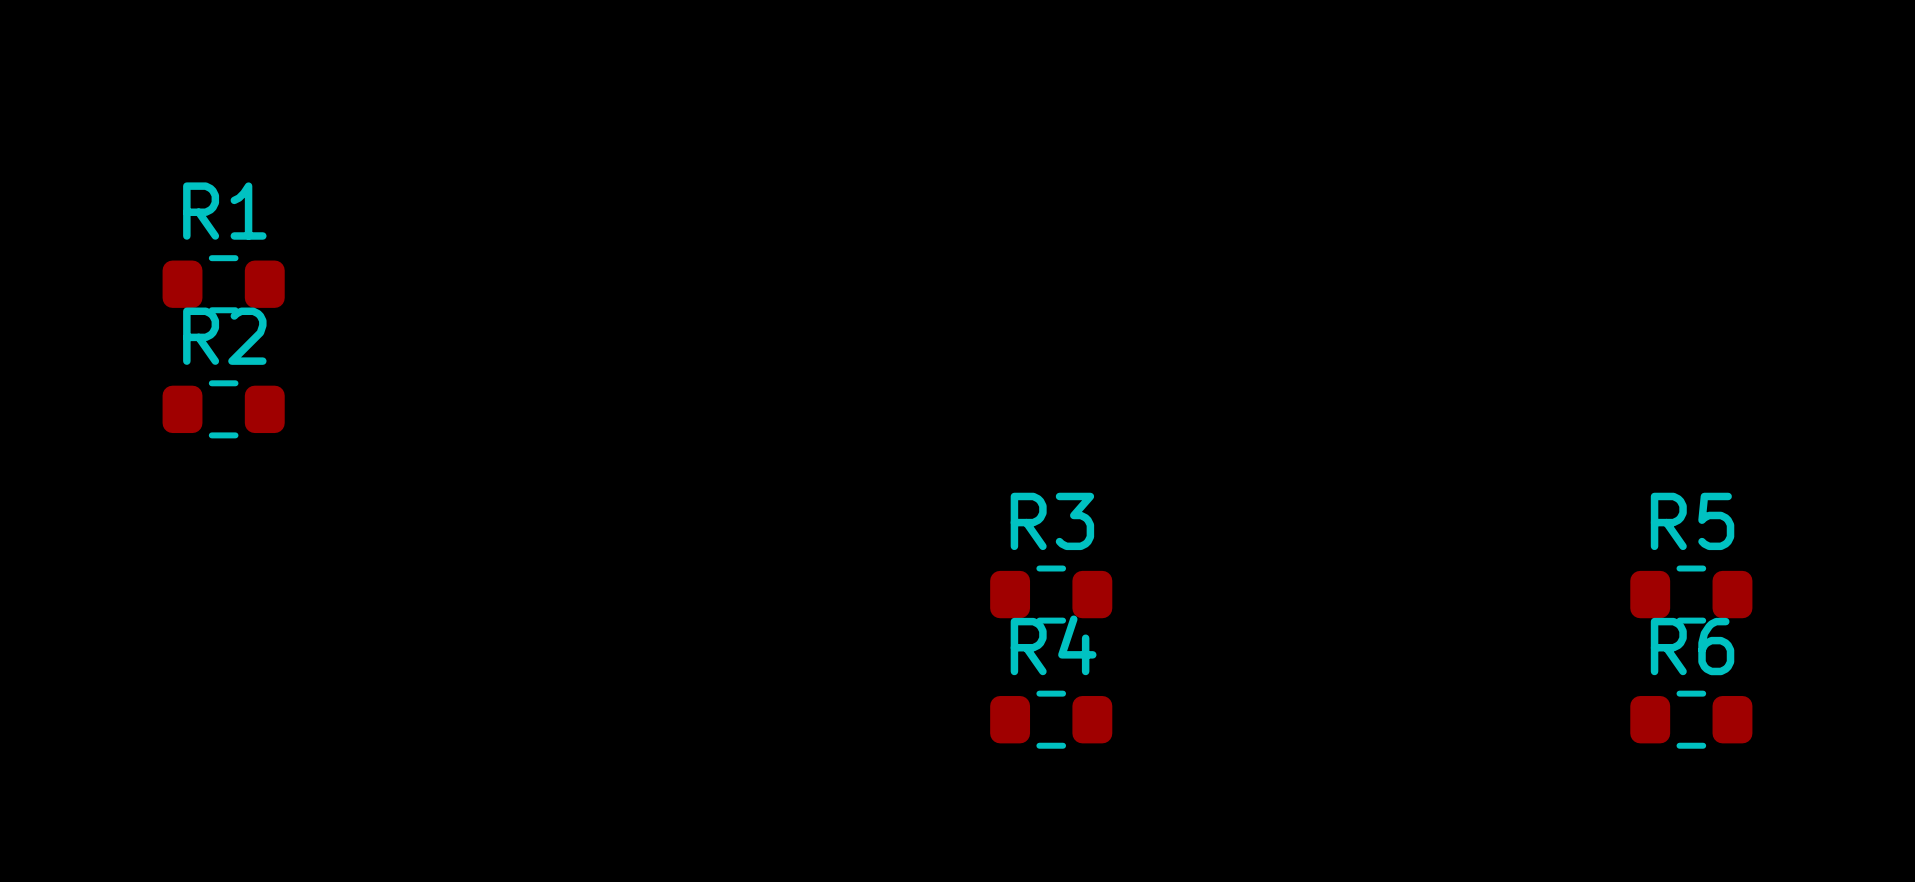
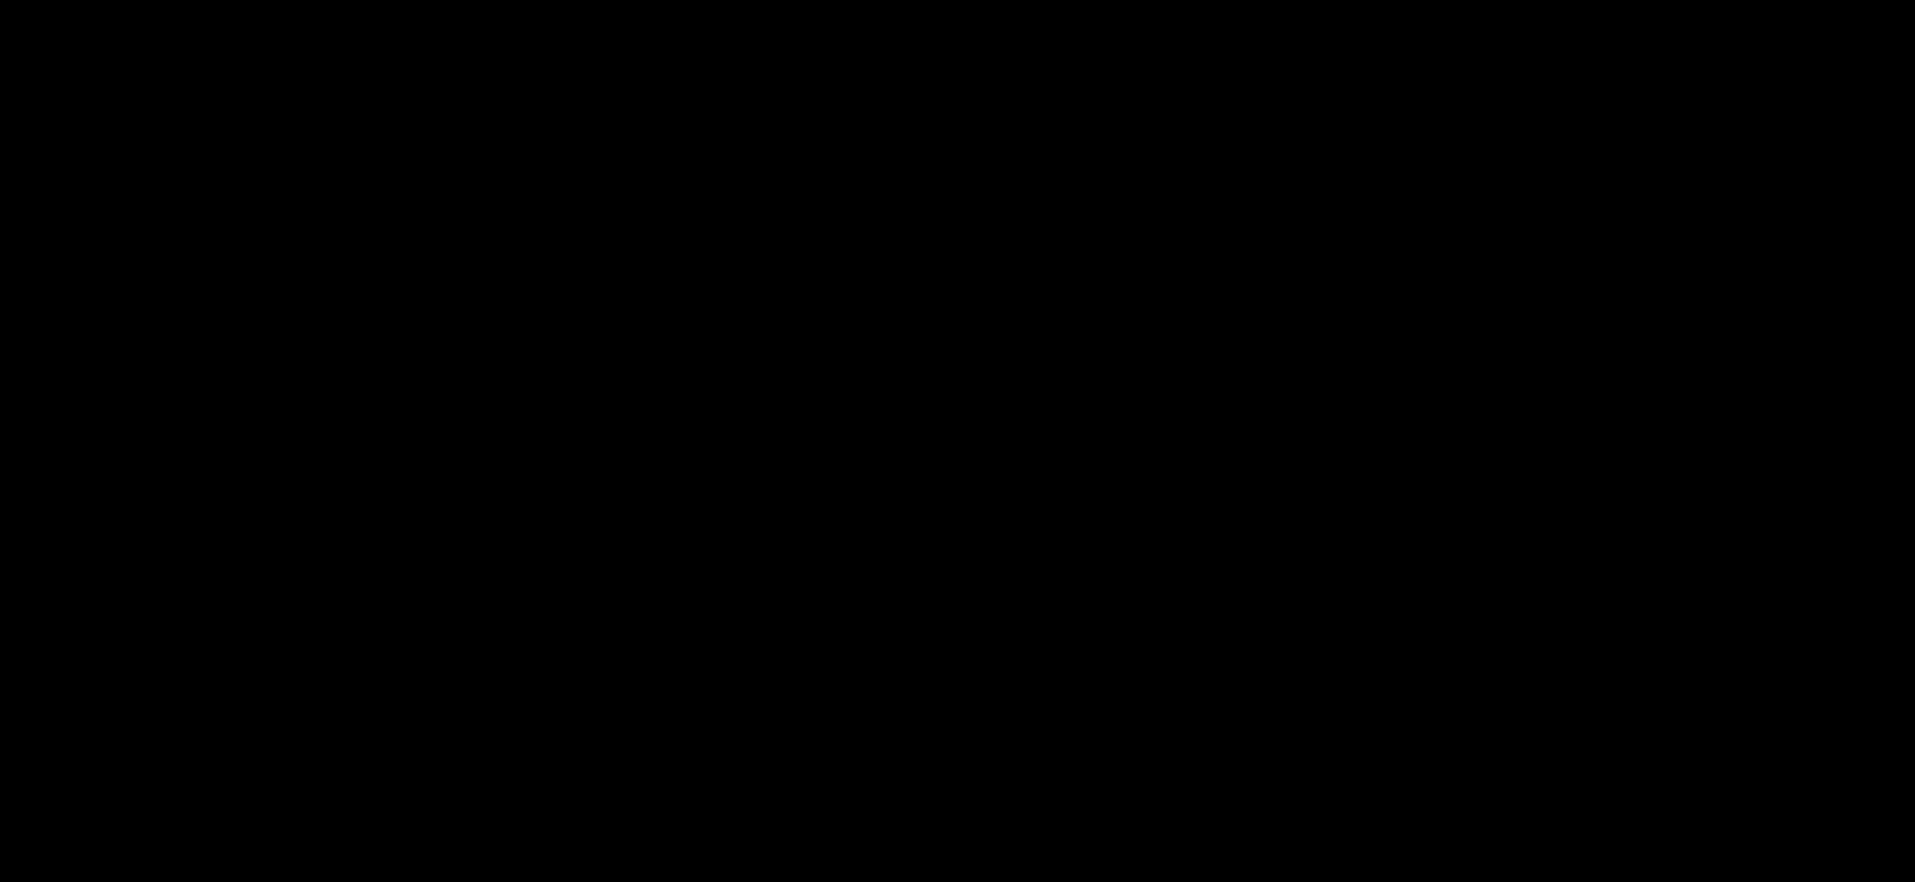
R1: (223, 284) -> none
R2: (223, 409) -> none
R3: (1051, 594) -> none
R5: (1691, 594) -> none
R4: (1051, 719) -> none
R6: (1691, 719) -> none

